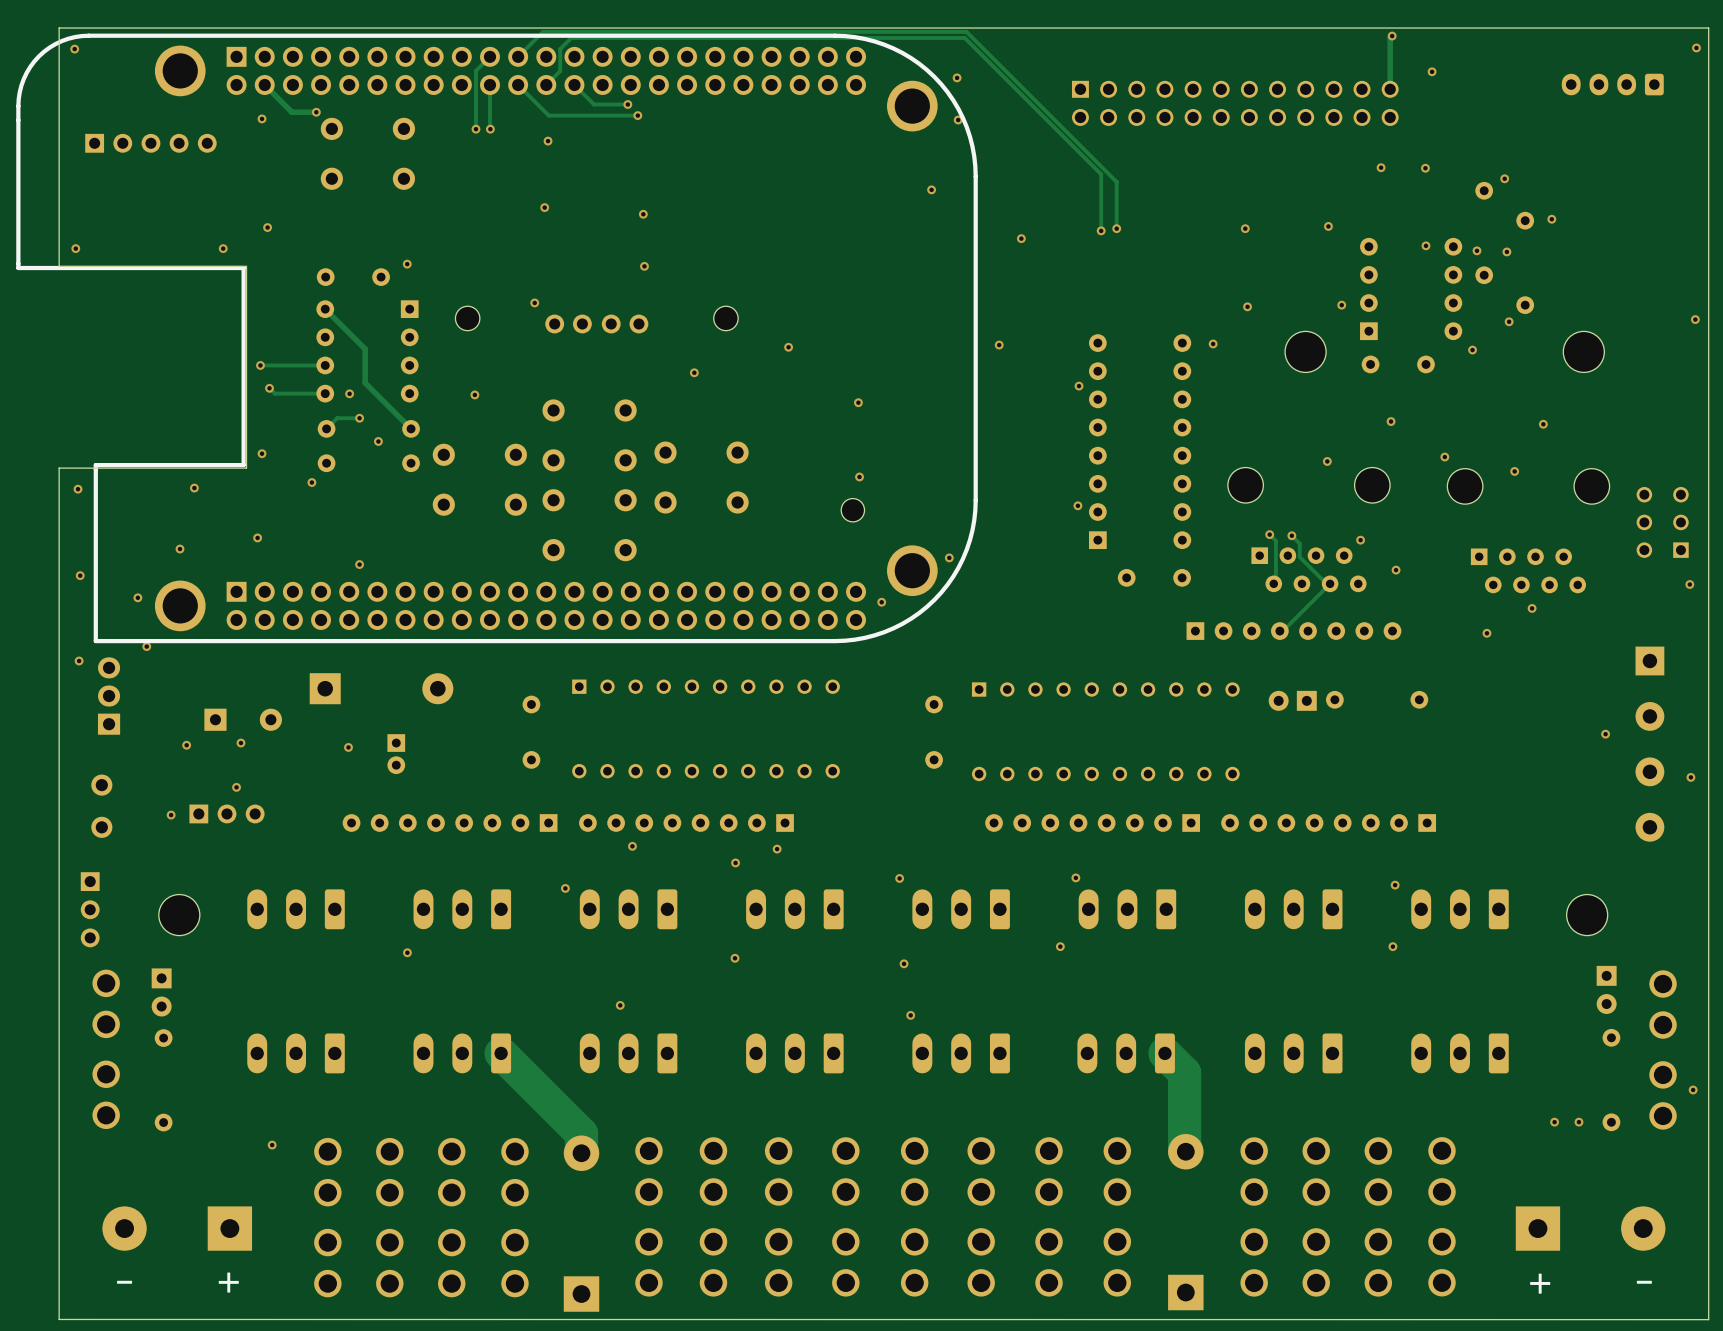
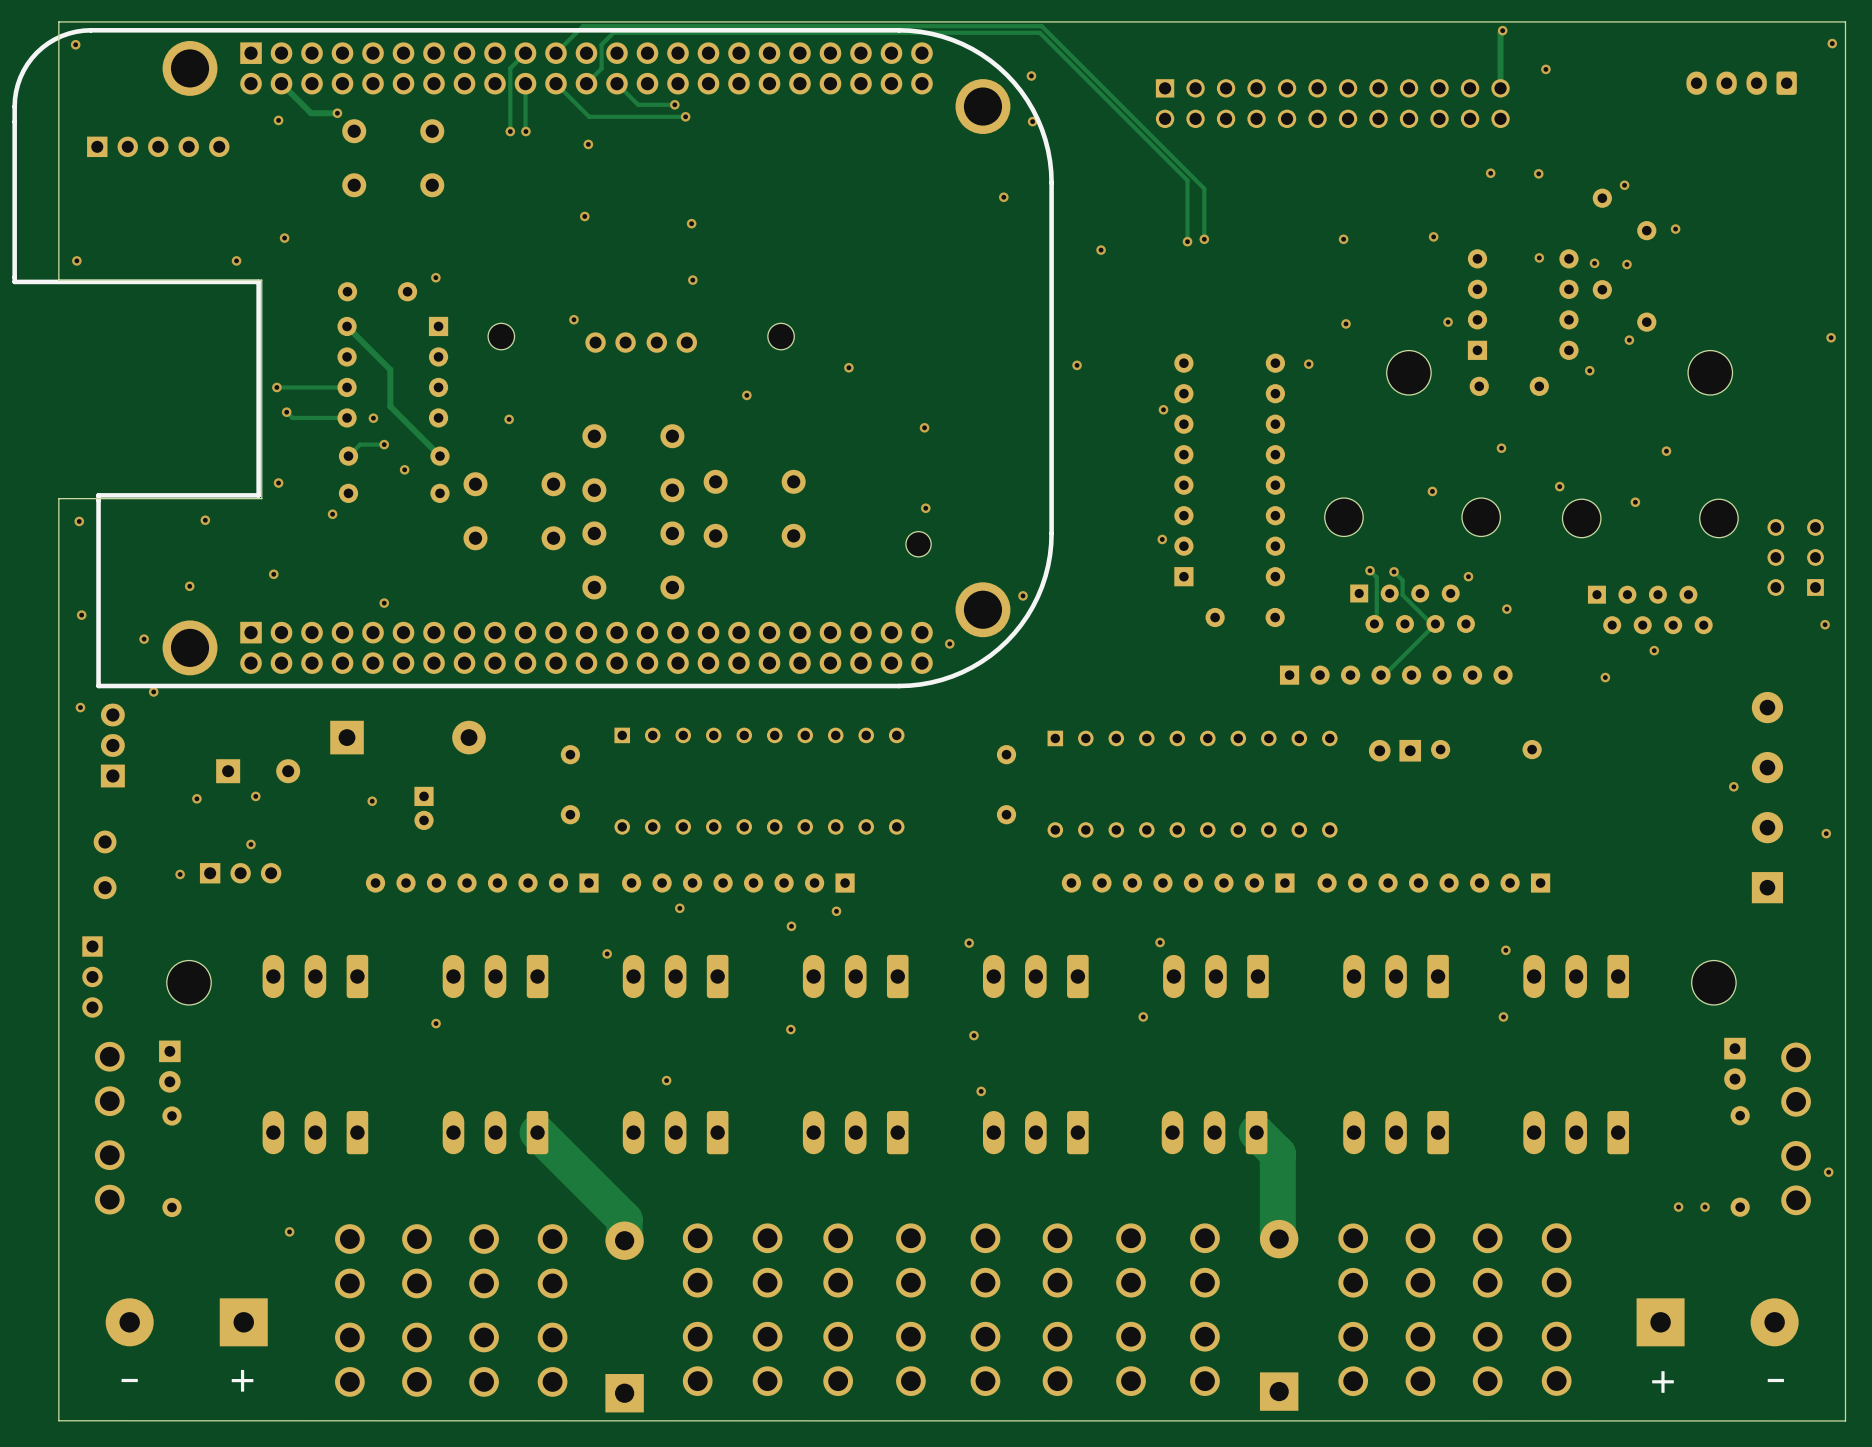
part rotation: 0° (1649, 744) -> 180° (1767, 797)

